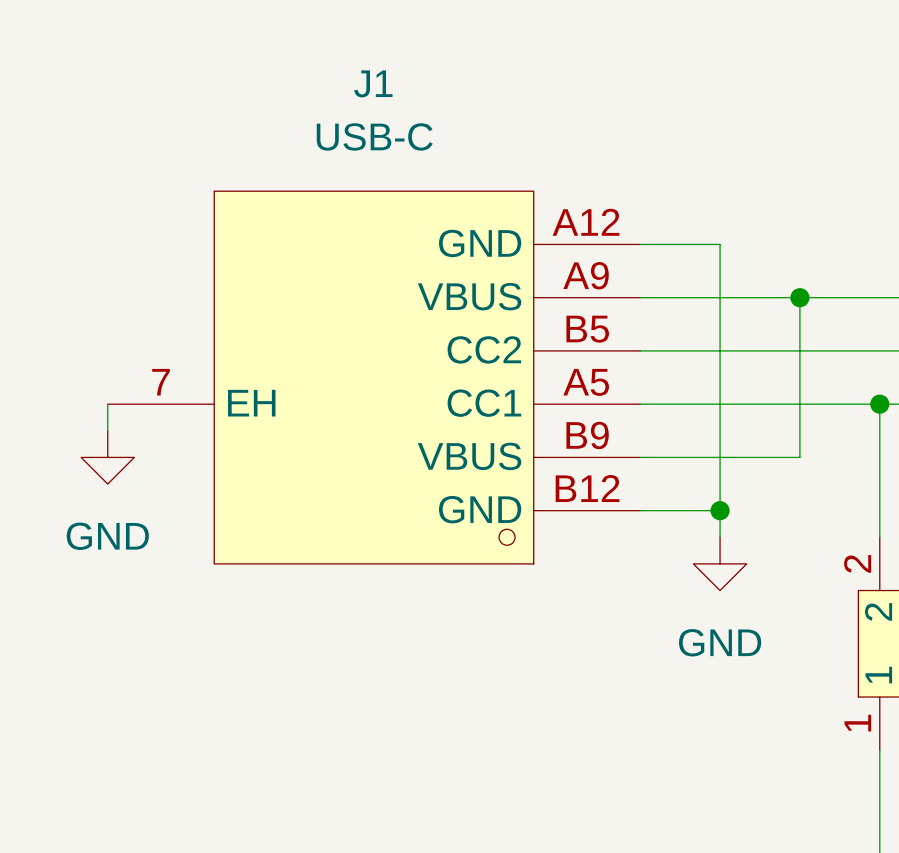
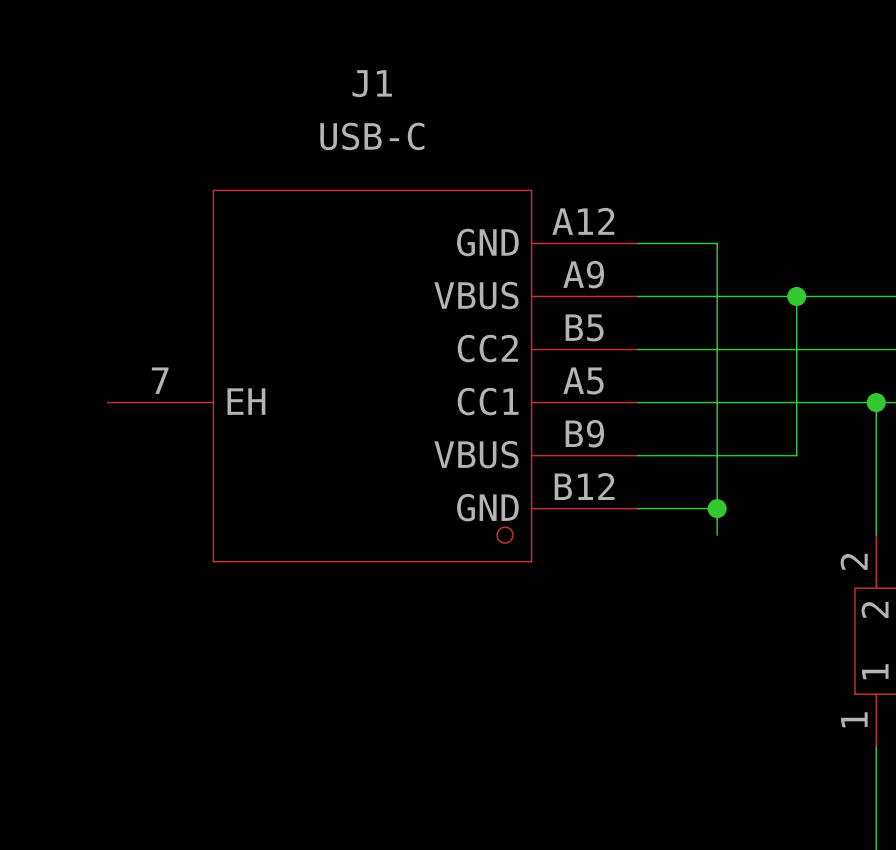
wire: (107, 404) (107, 430) -> none
power symbol: GND (107, 457) -> none
power symbol: GND (720, 563) -> none

